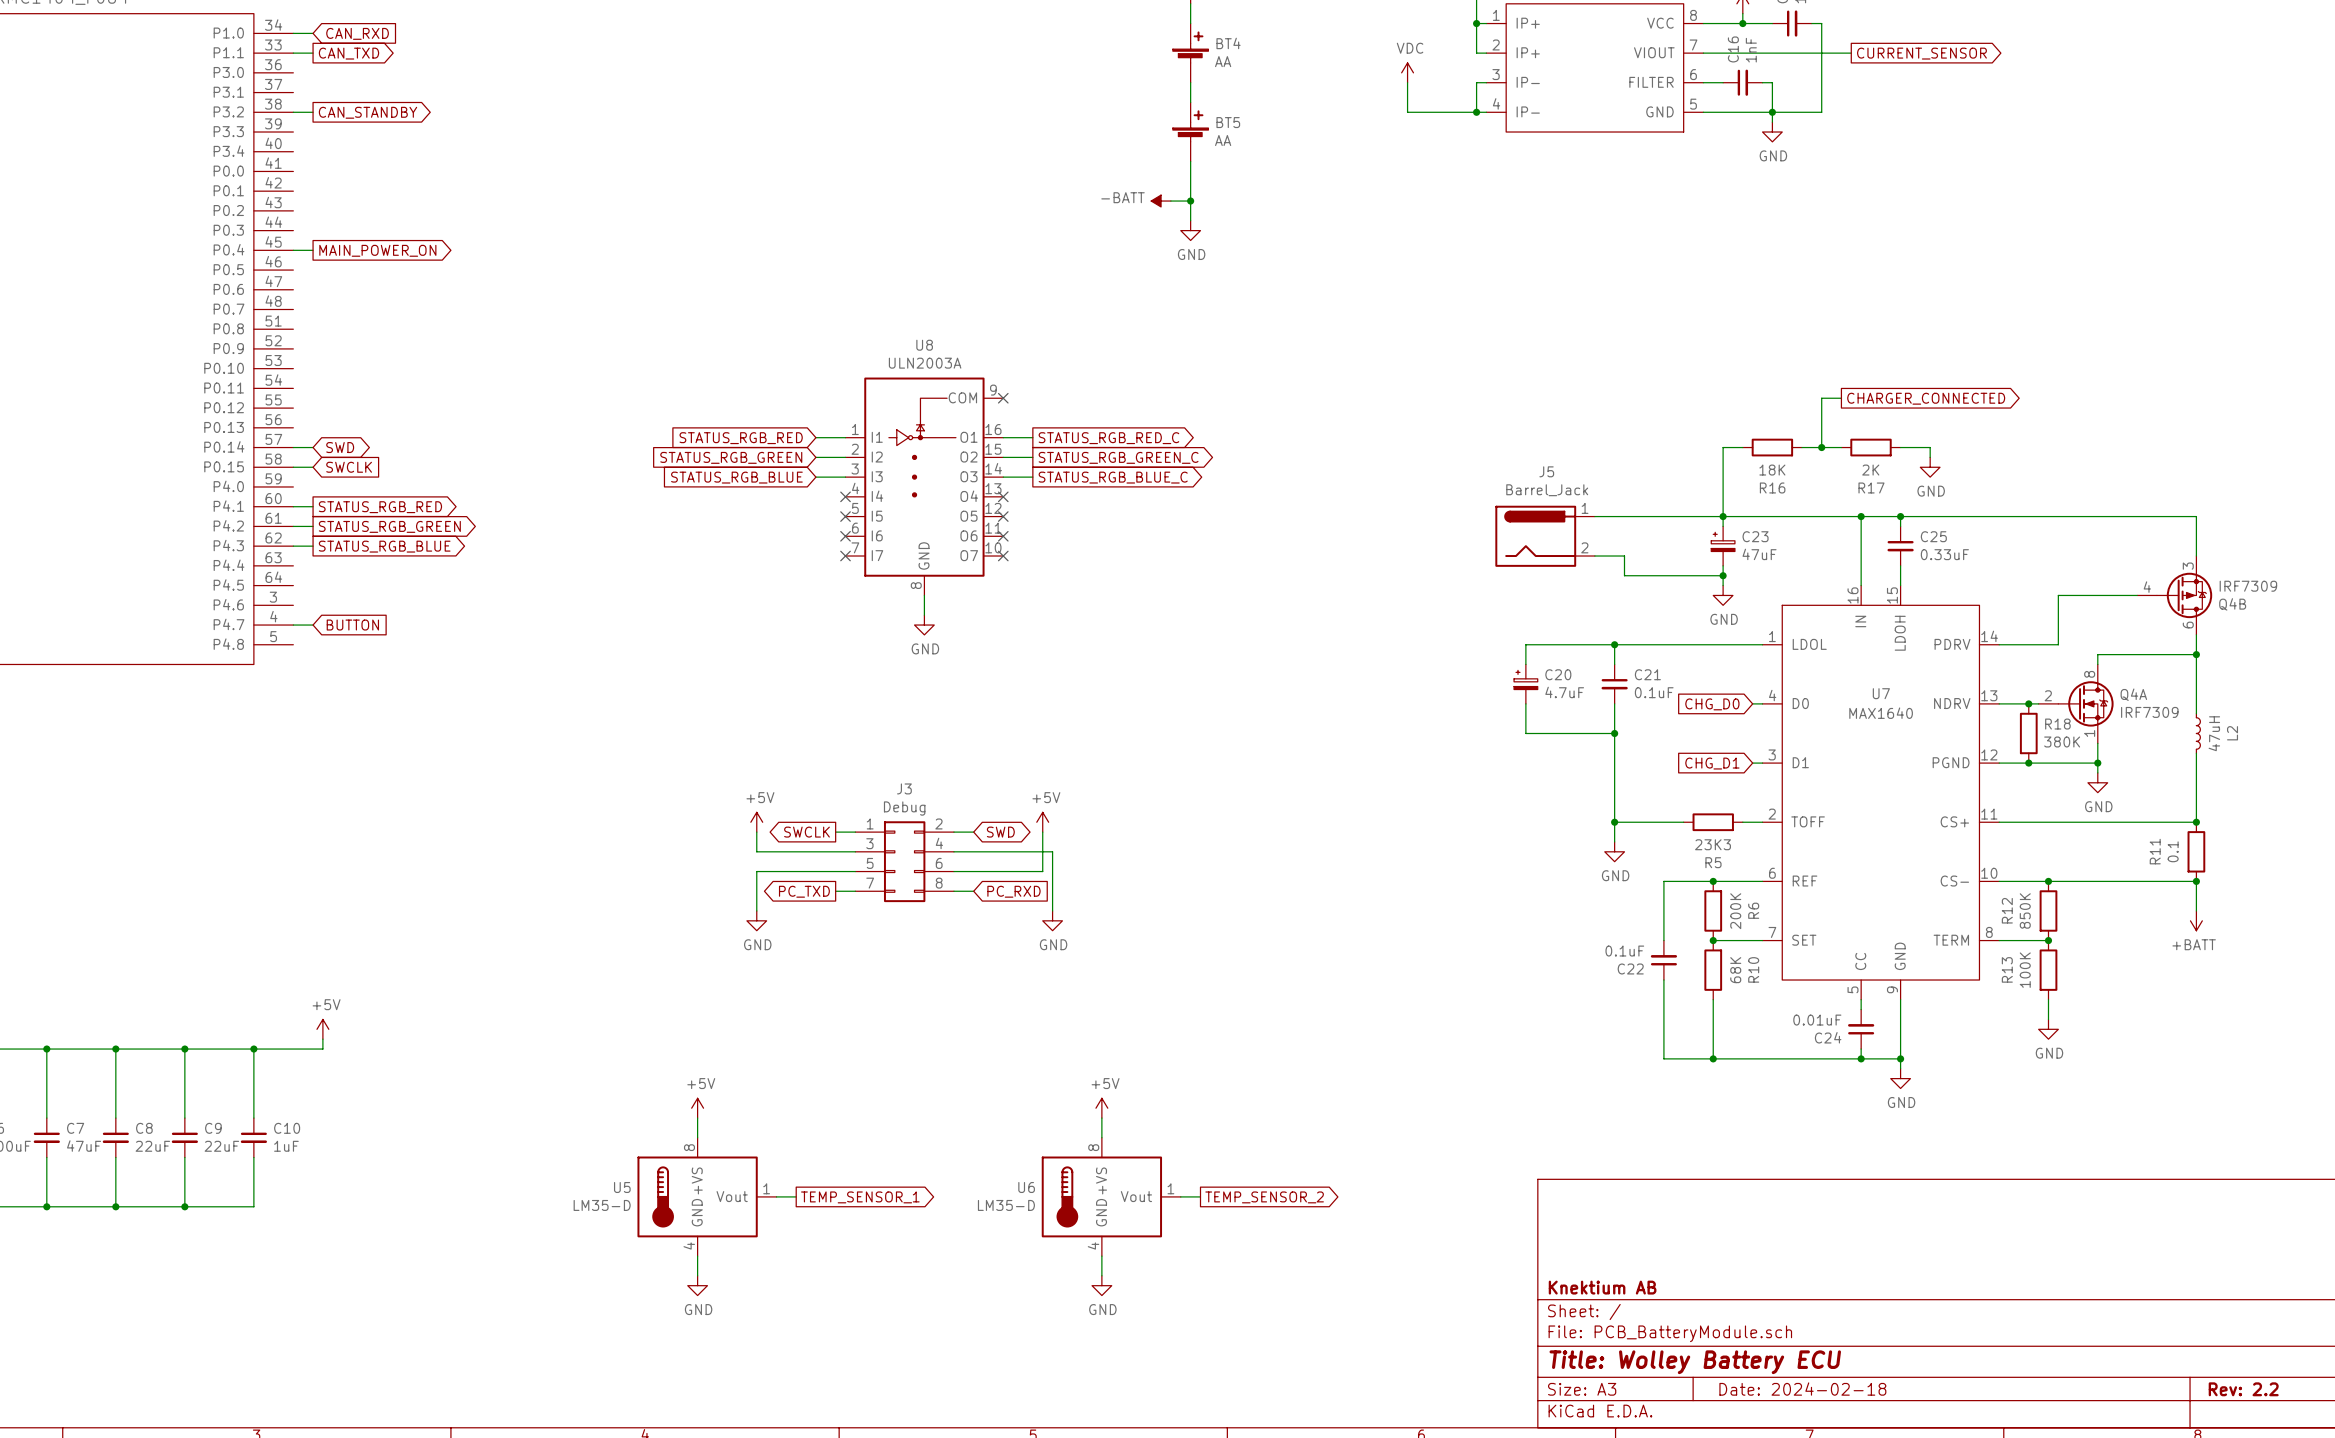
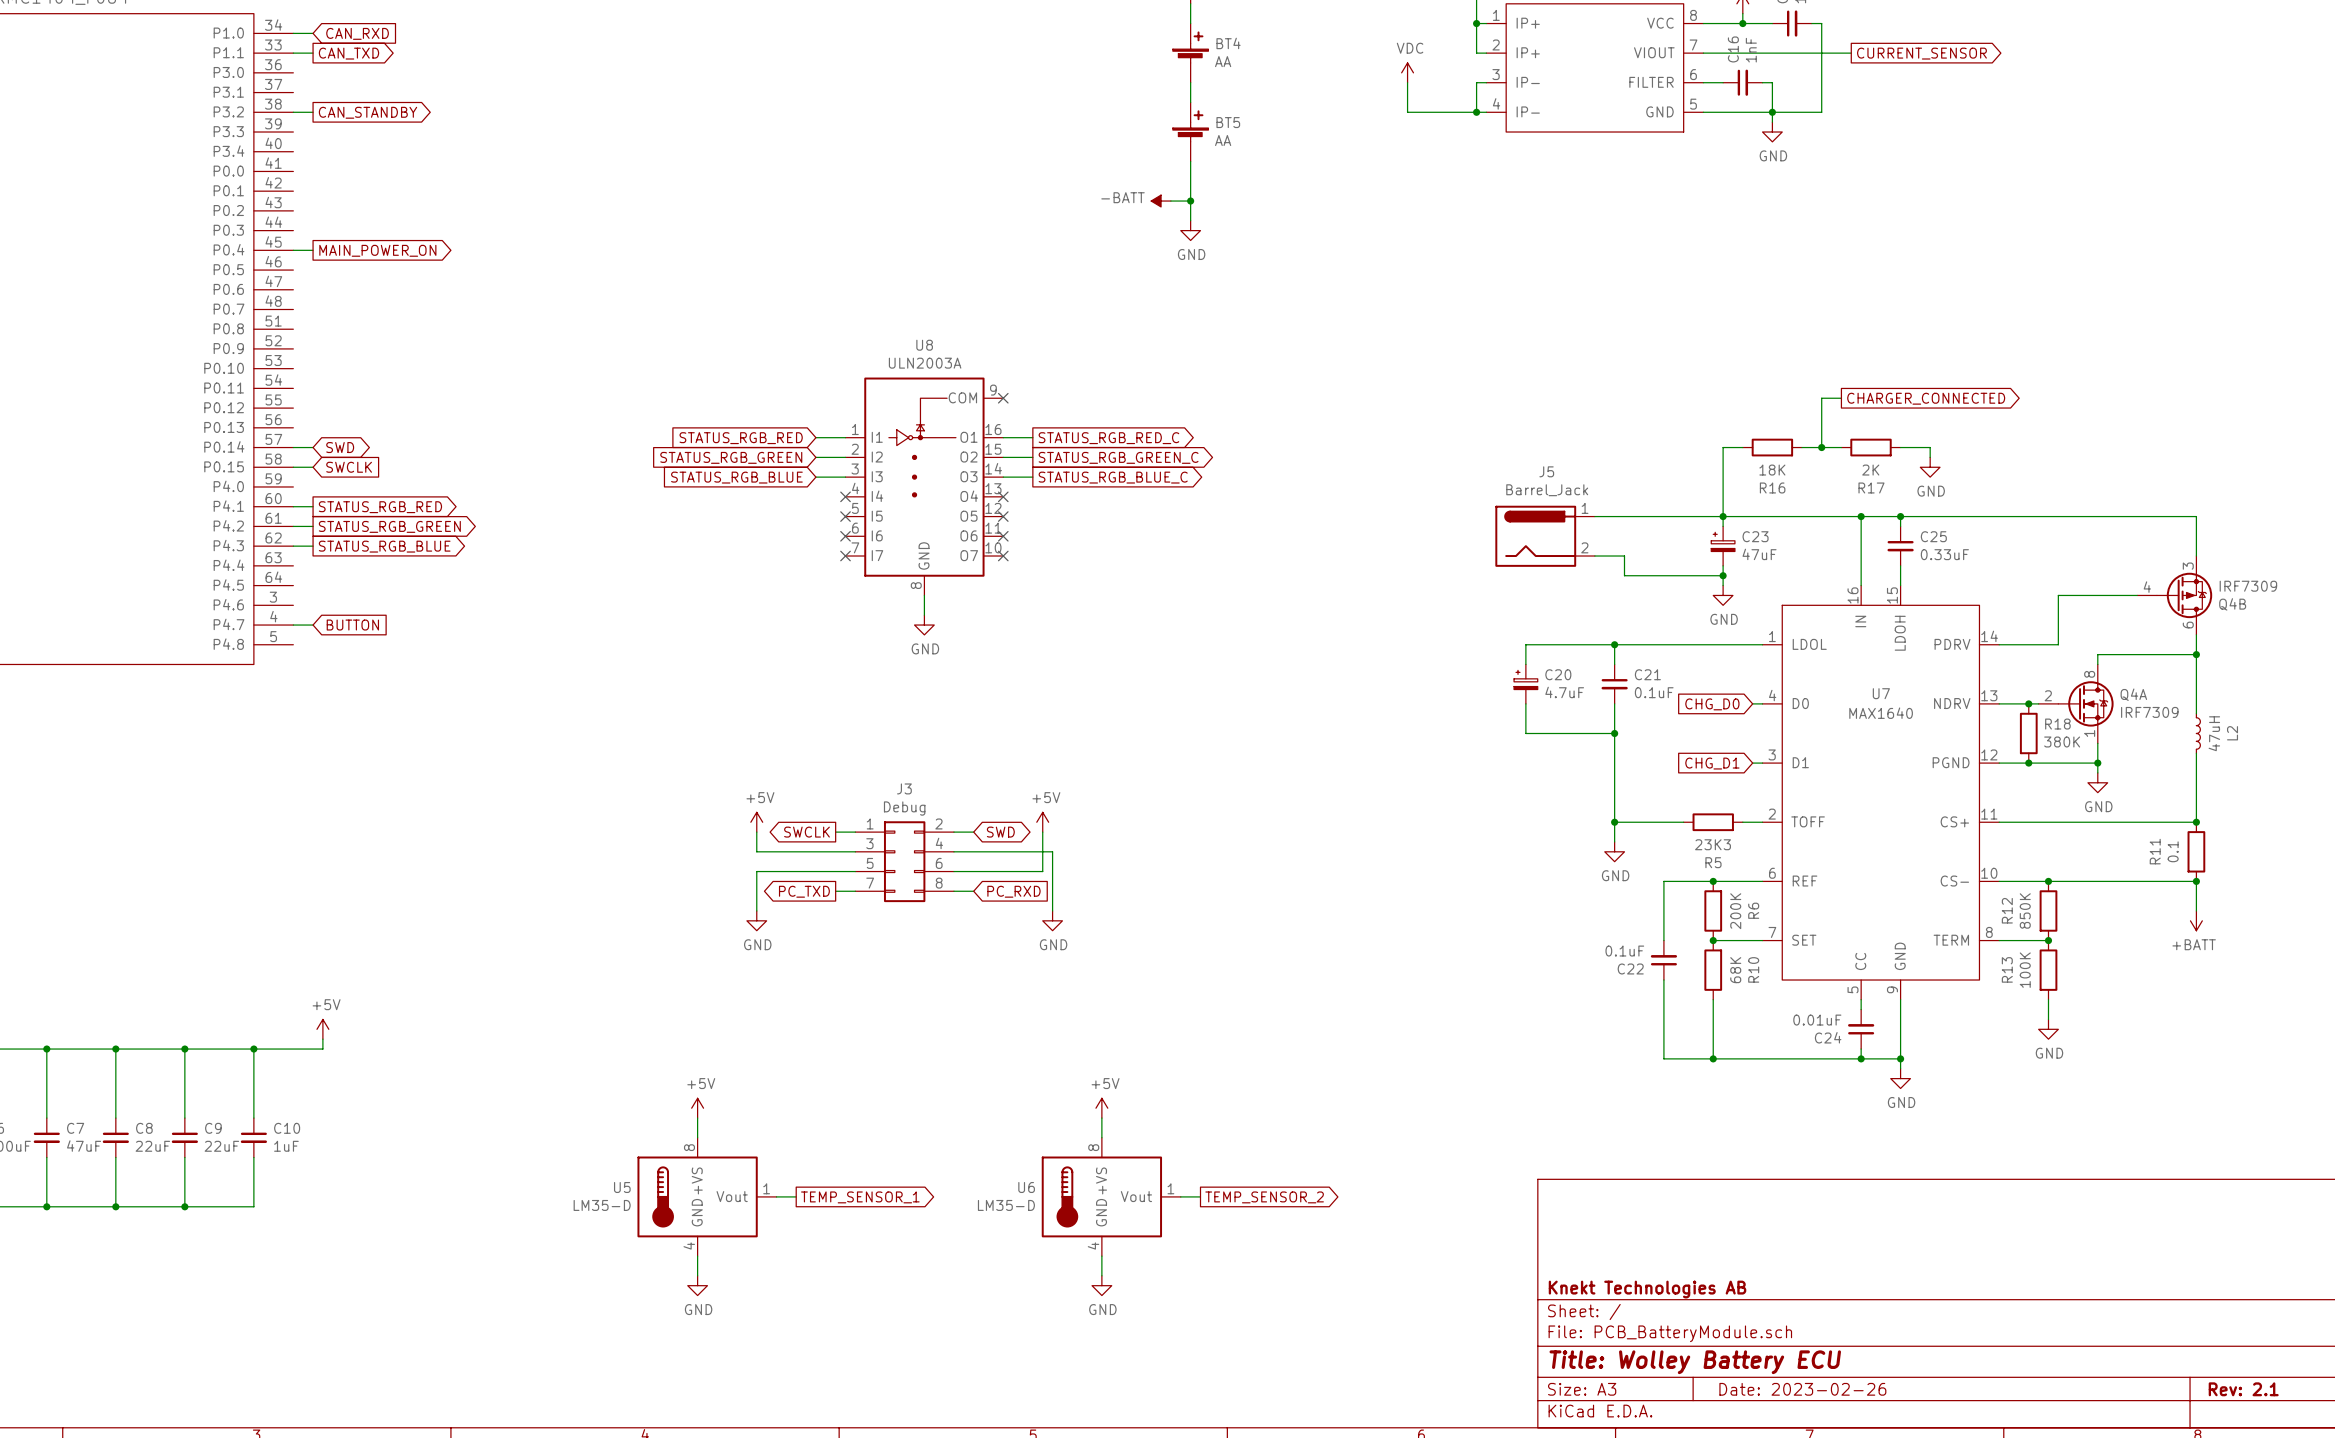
title block: Knektium AB (1602, 1287) -> Knekt Technologies AB (1647, 1289)
title block: Date: 2024-02-18 (1802, 1389) -> Date: 2023-02-26 (1802, 1389)
title block: Rev: 2.2 (2243, 1389) -> Rev: 2.1 (2243, 1389)

